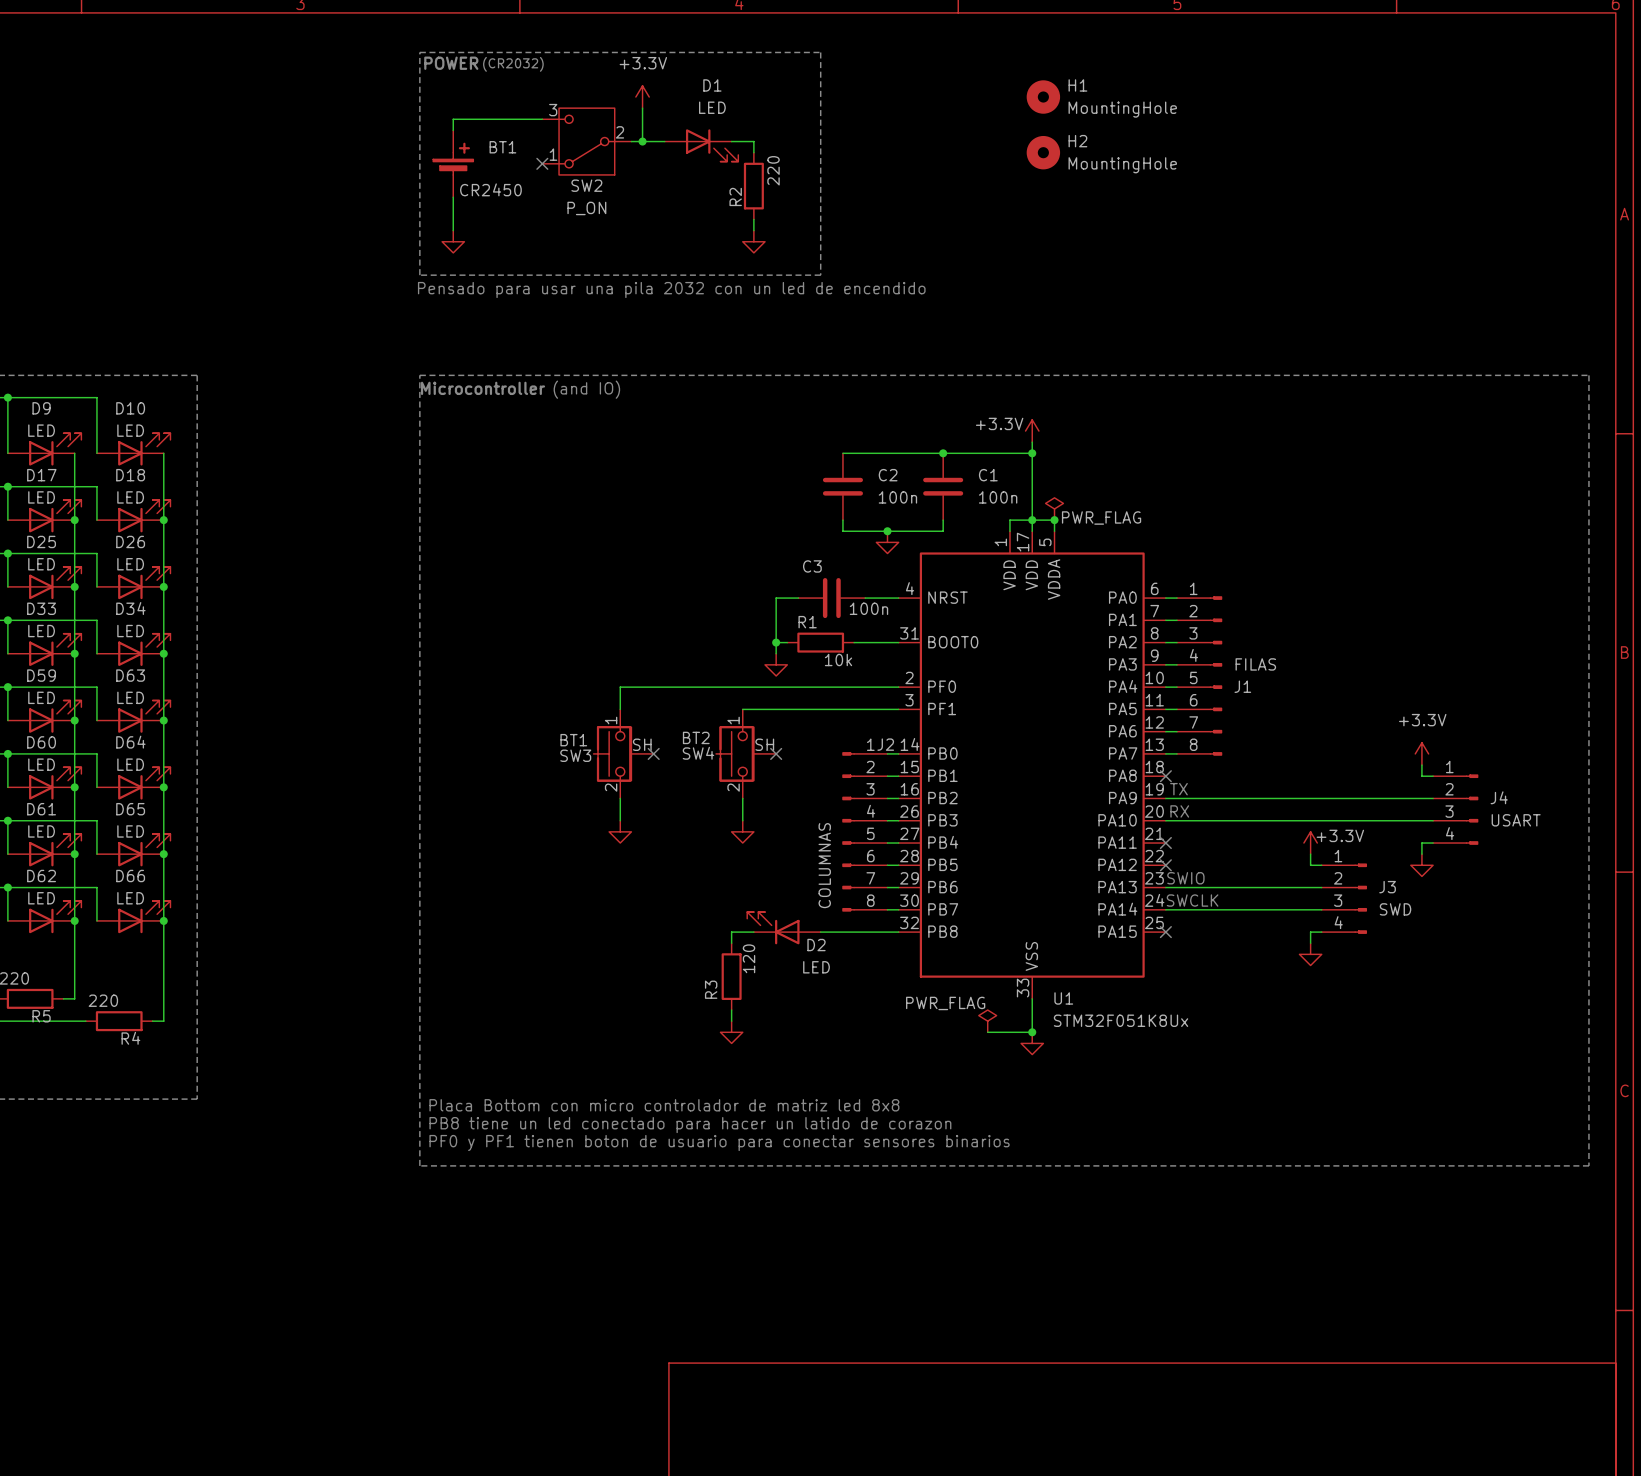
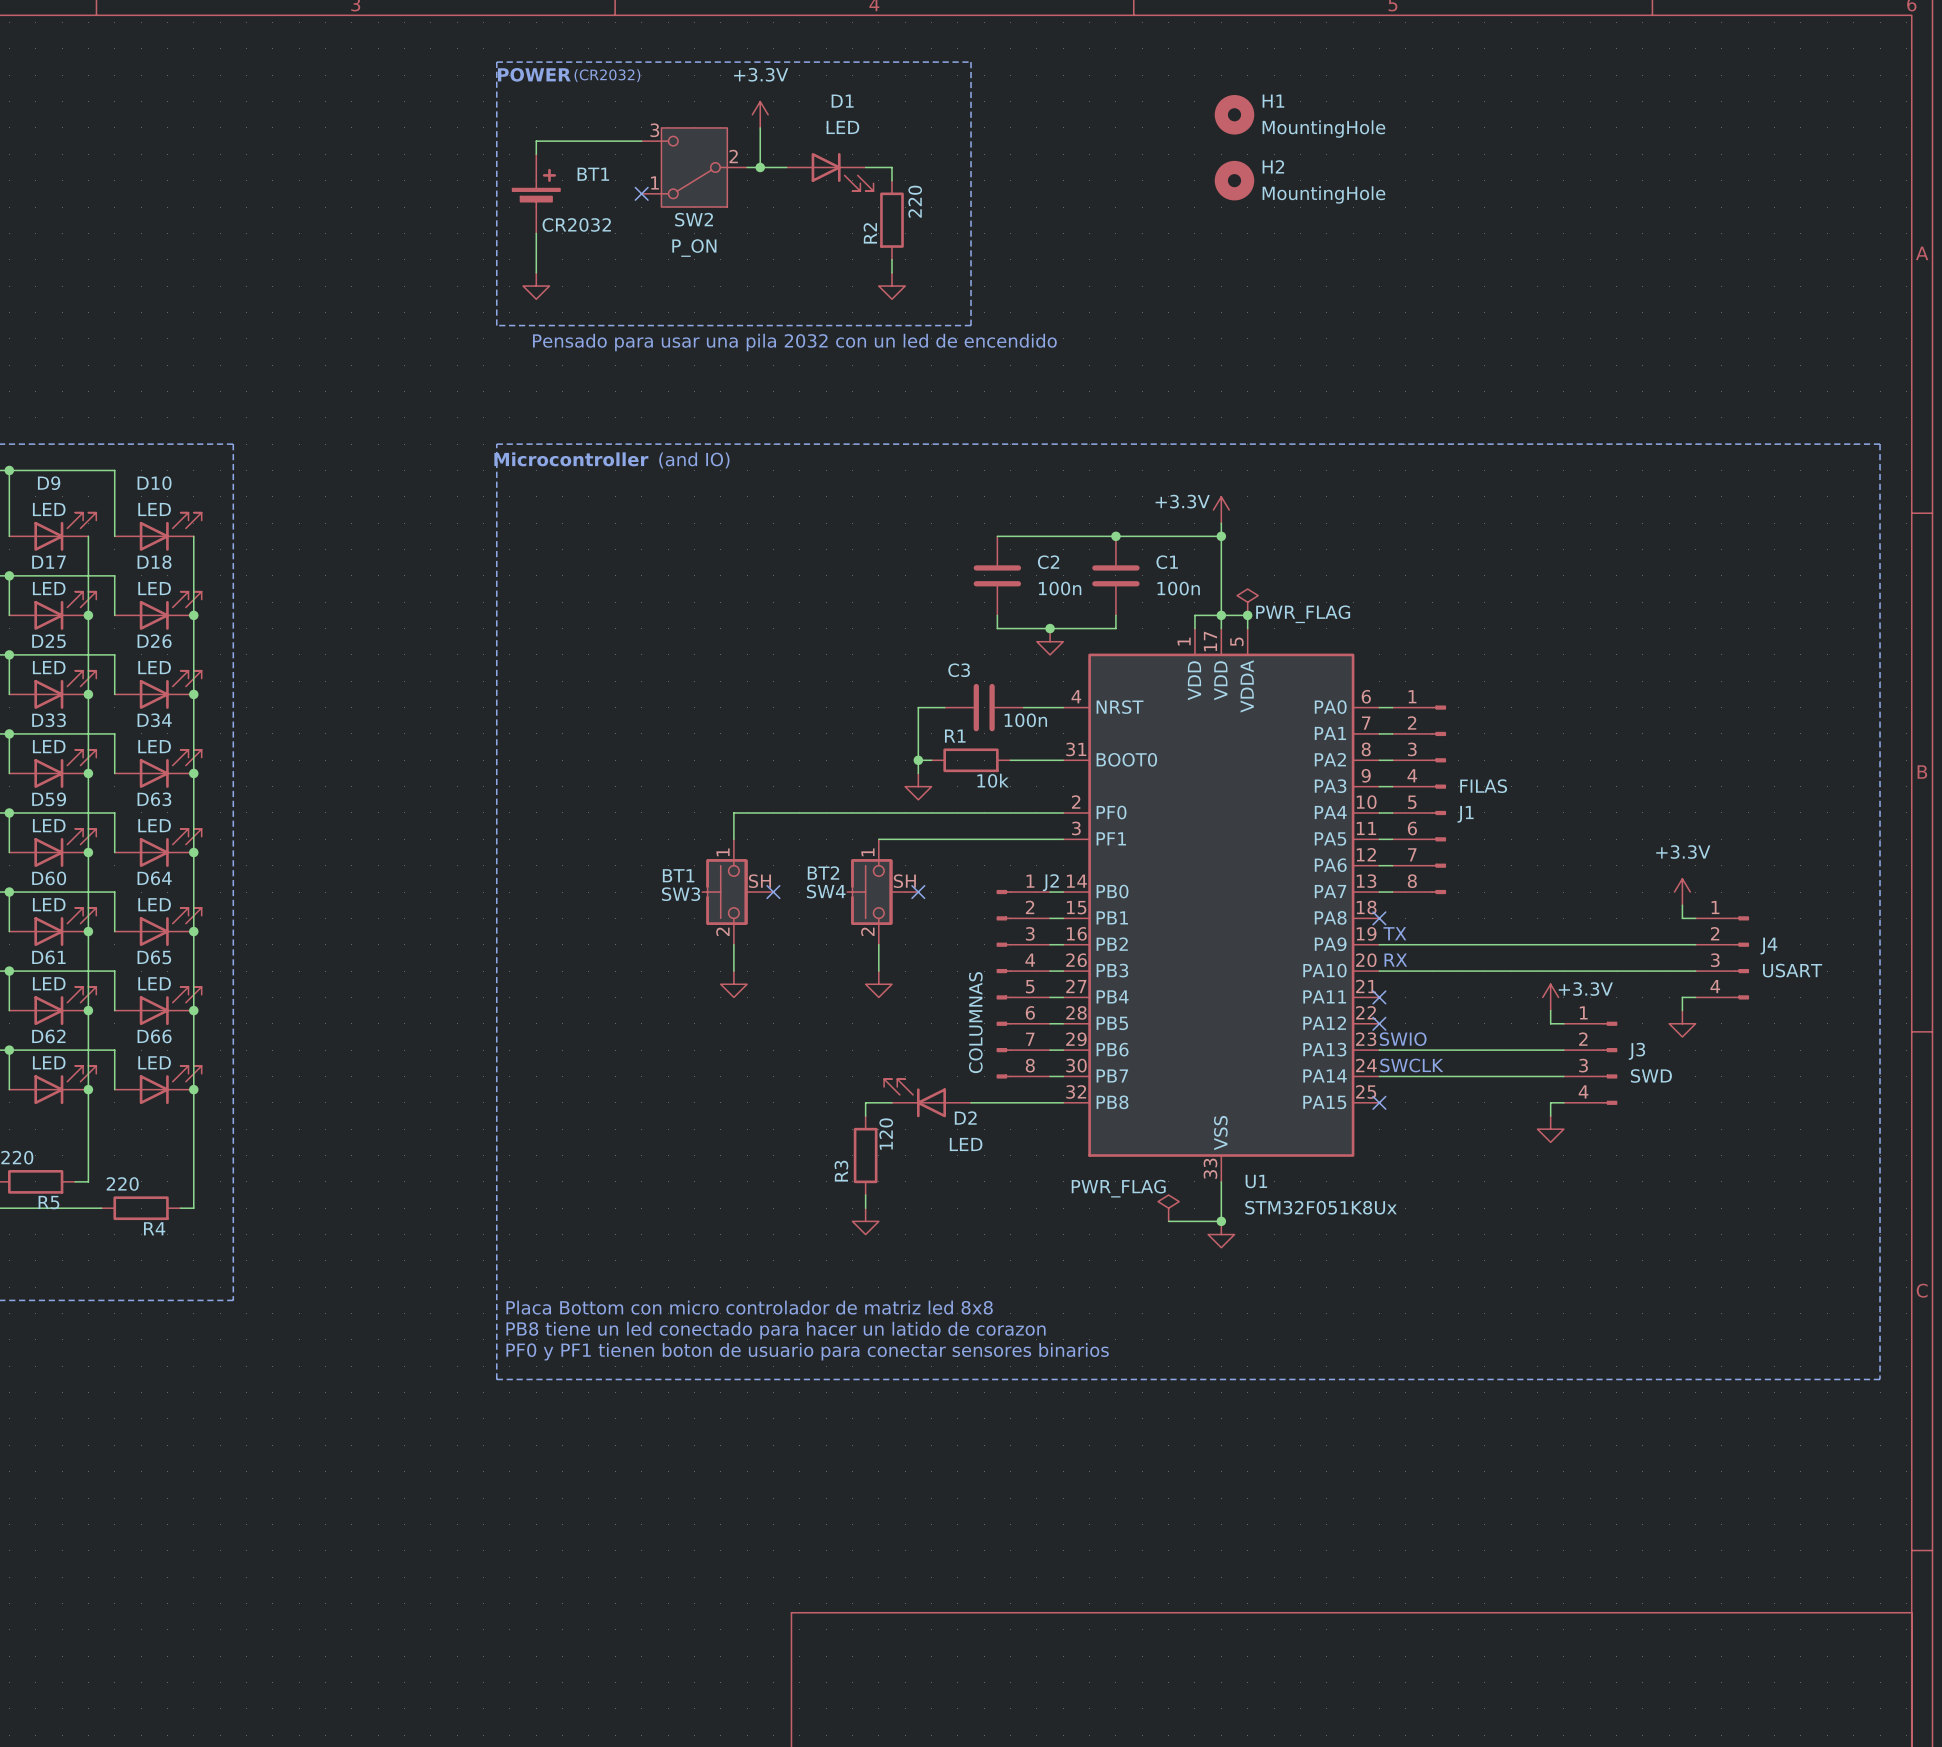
BT1 value: CR2450 (490, 189) -> CR2032 (576, 224)

